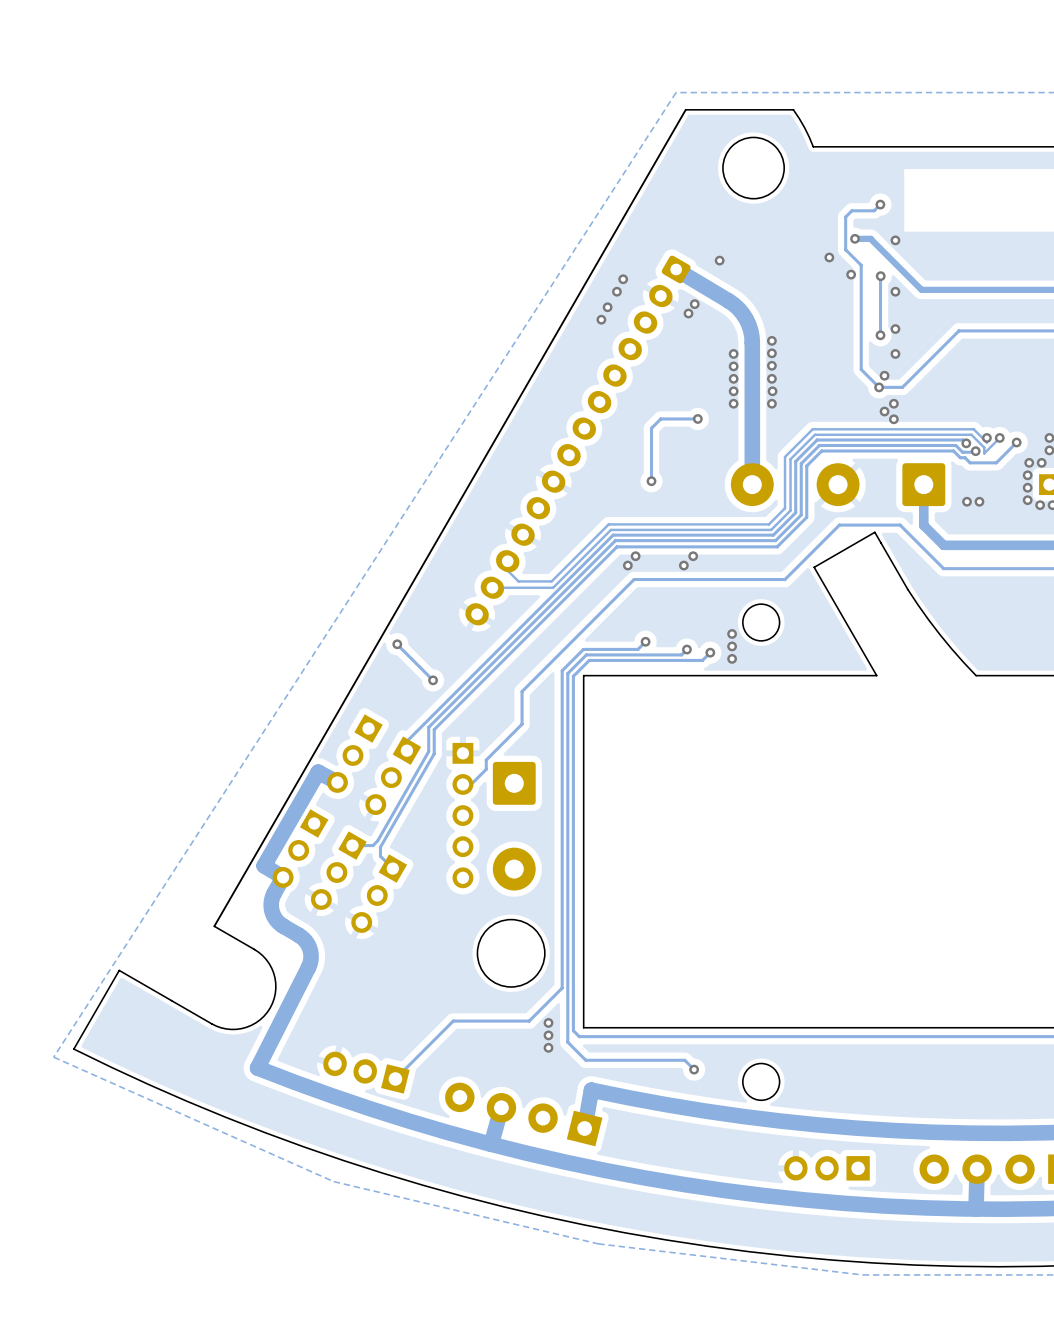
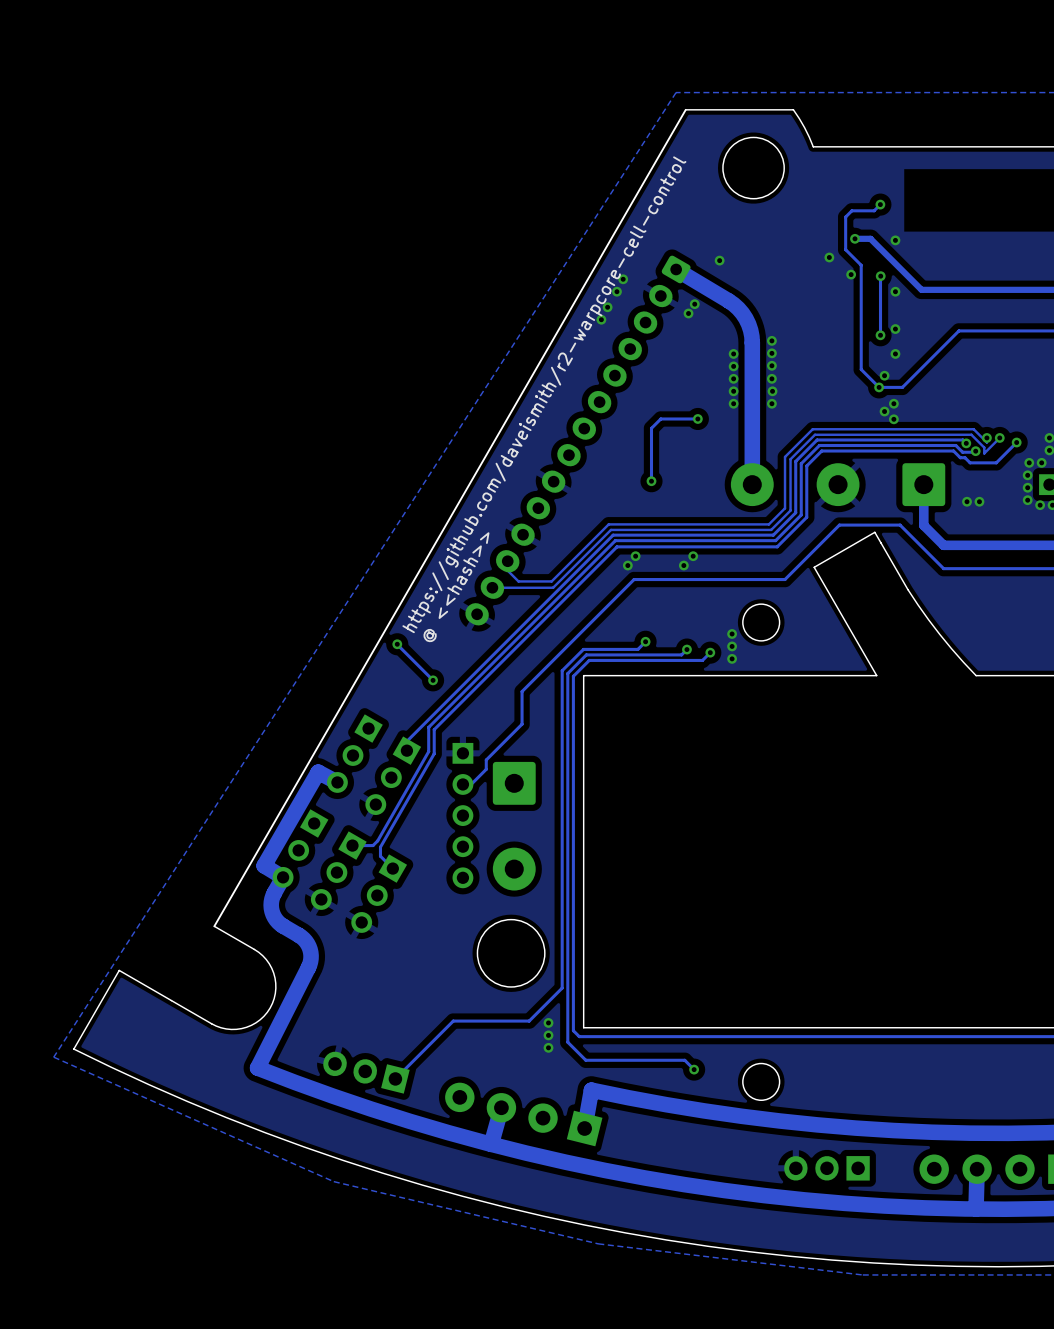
text: none -> https://github.com/daveismith/r2-warpcore-cell-control (544, 394)
text: none -> @ <<hash>> (456, 587)

